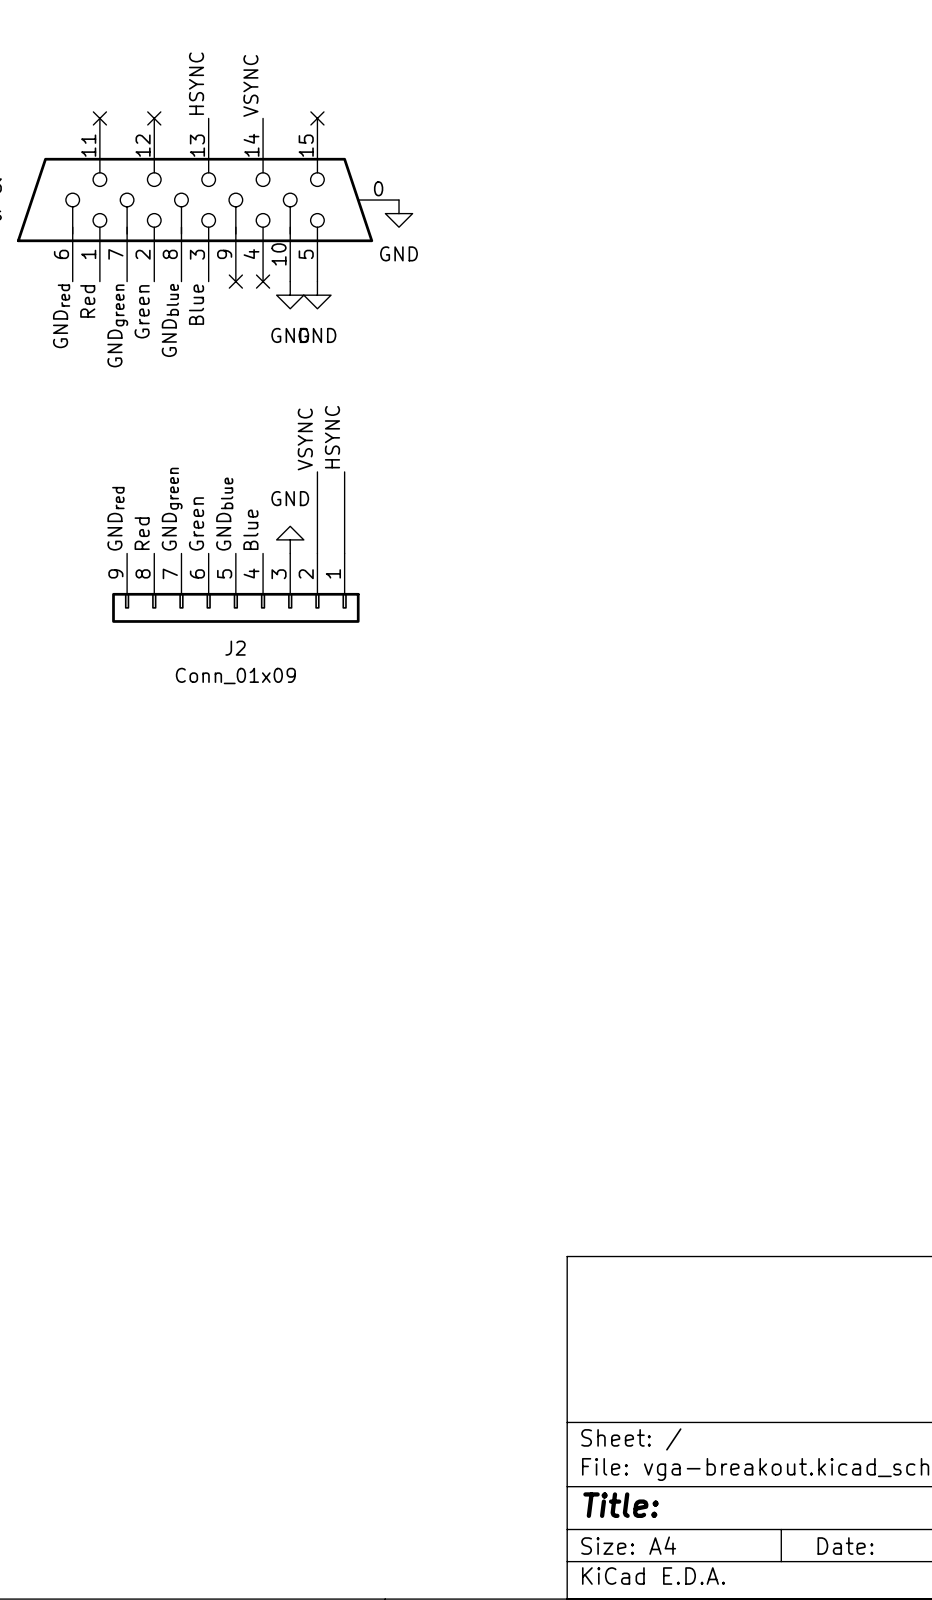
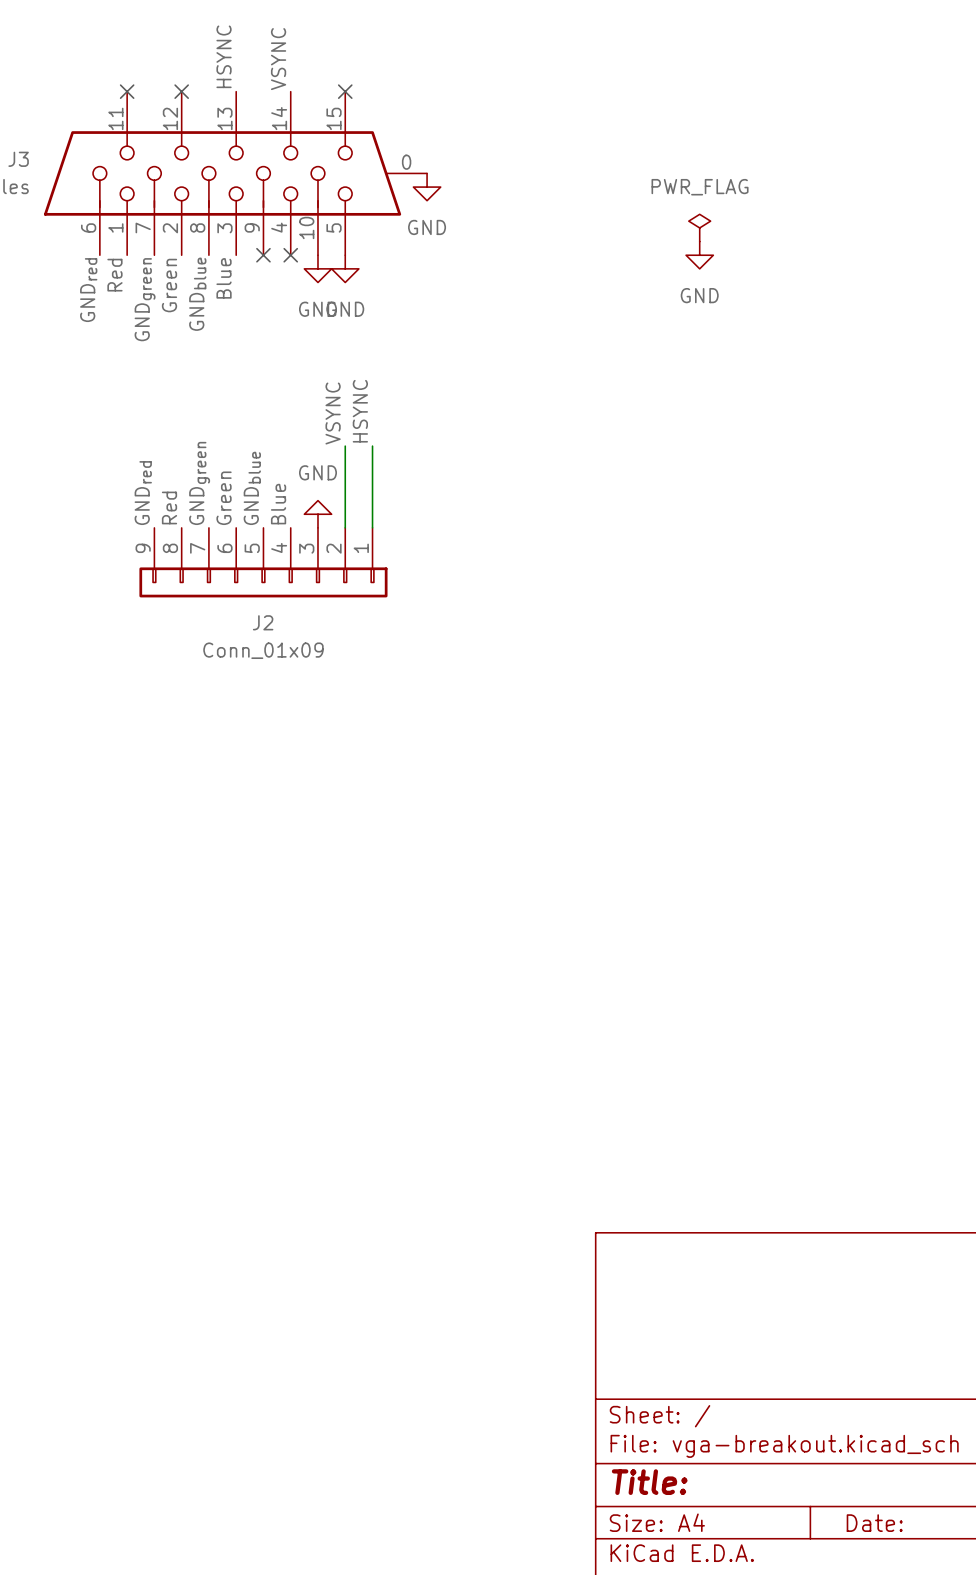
power symbol: none -> PWR_FLAG (699, 227)
power symbol: none -> GND (699, 255)

